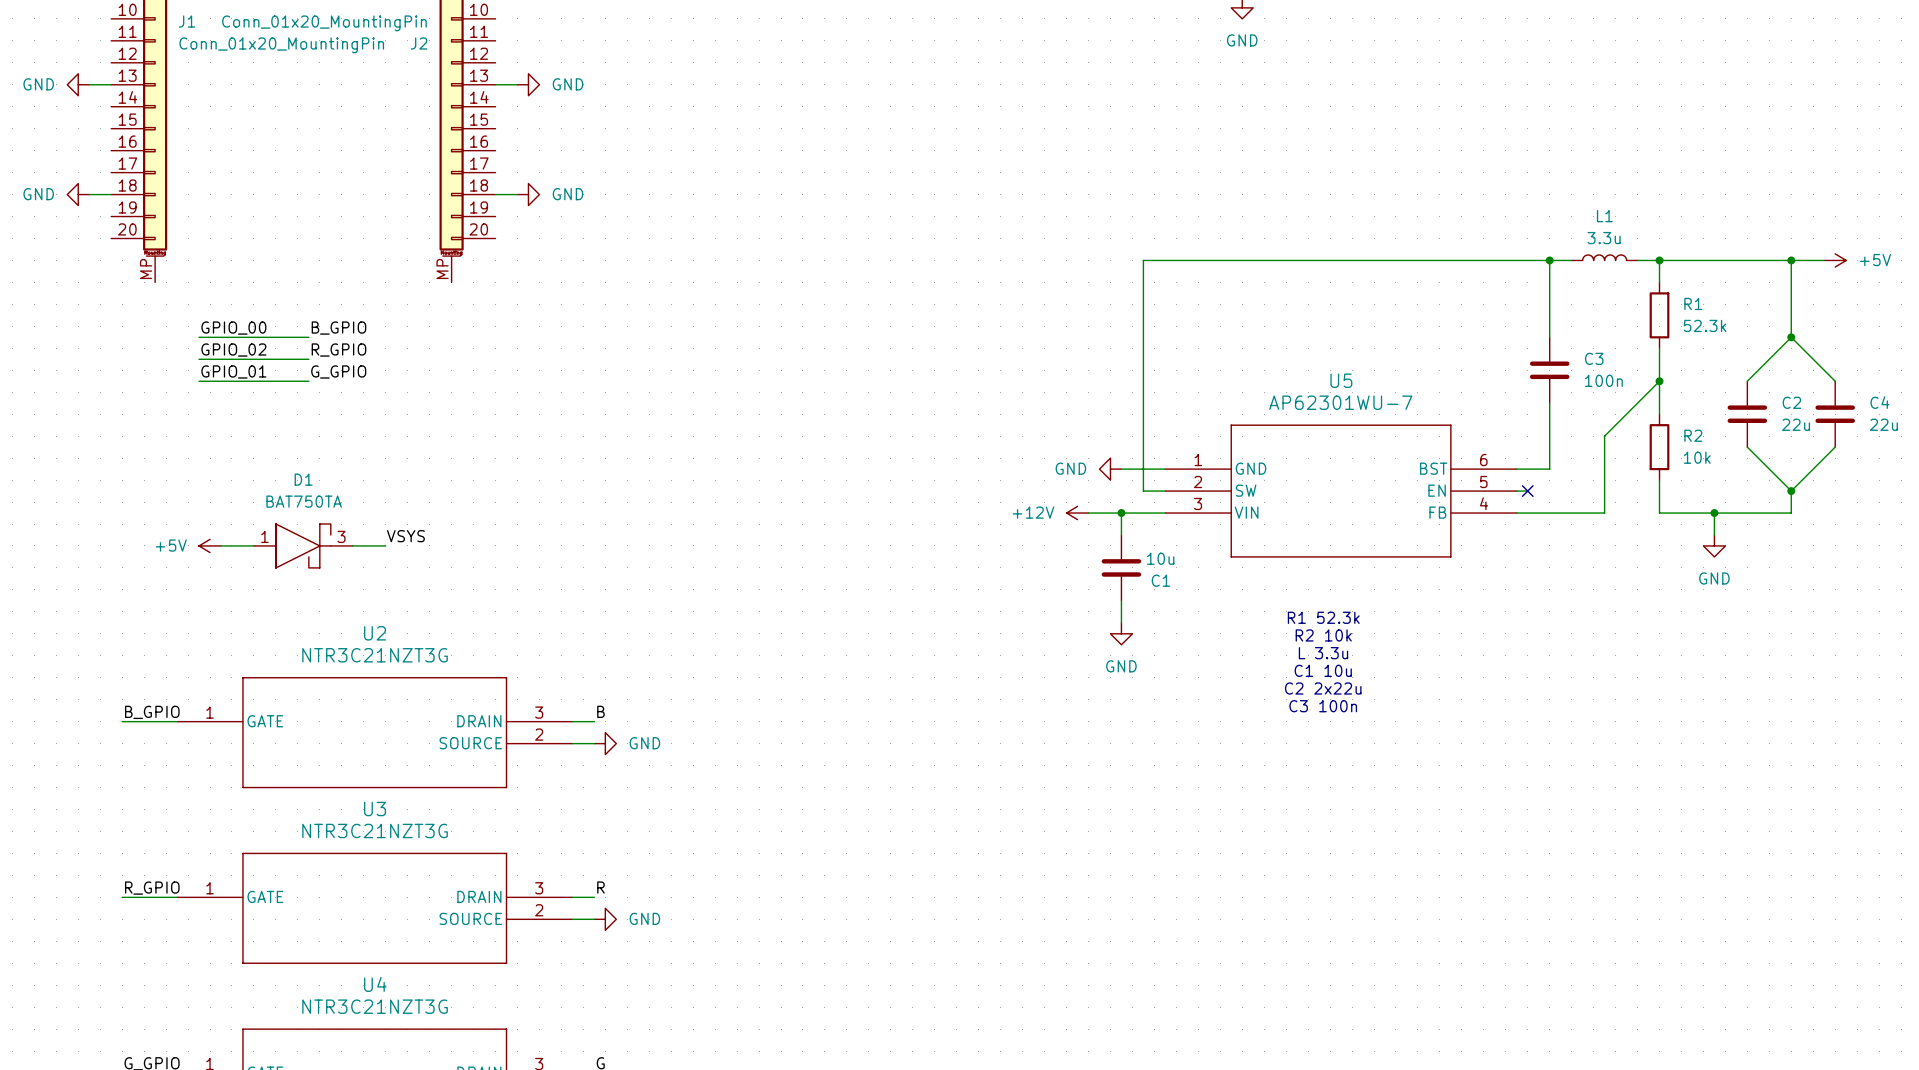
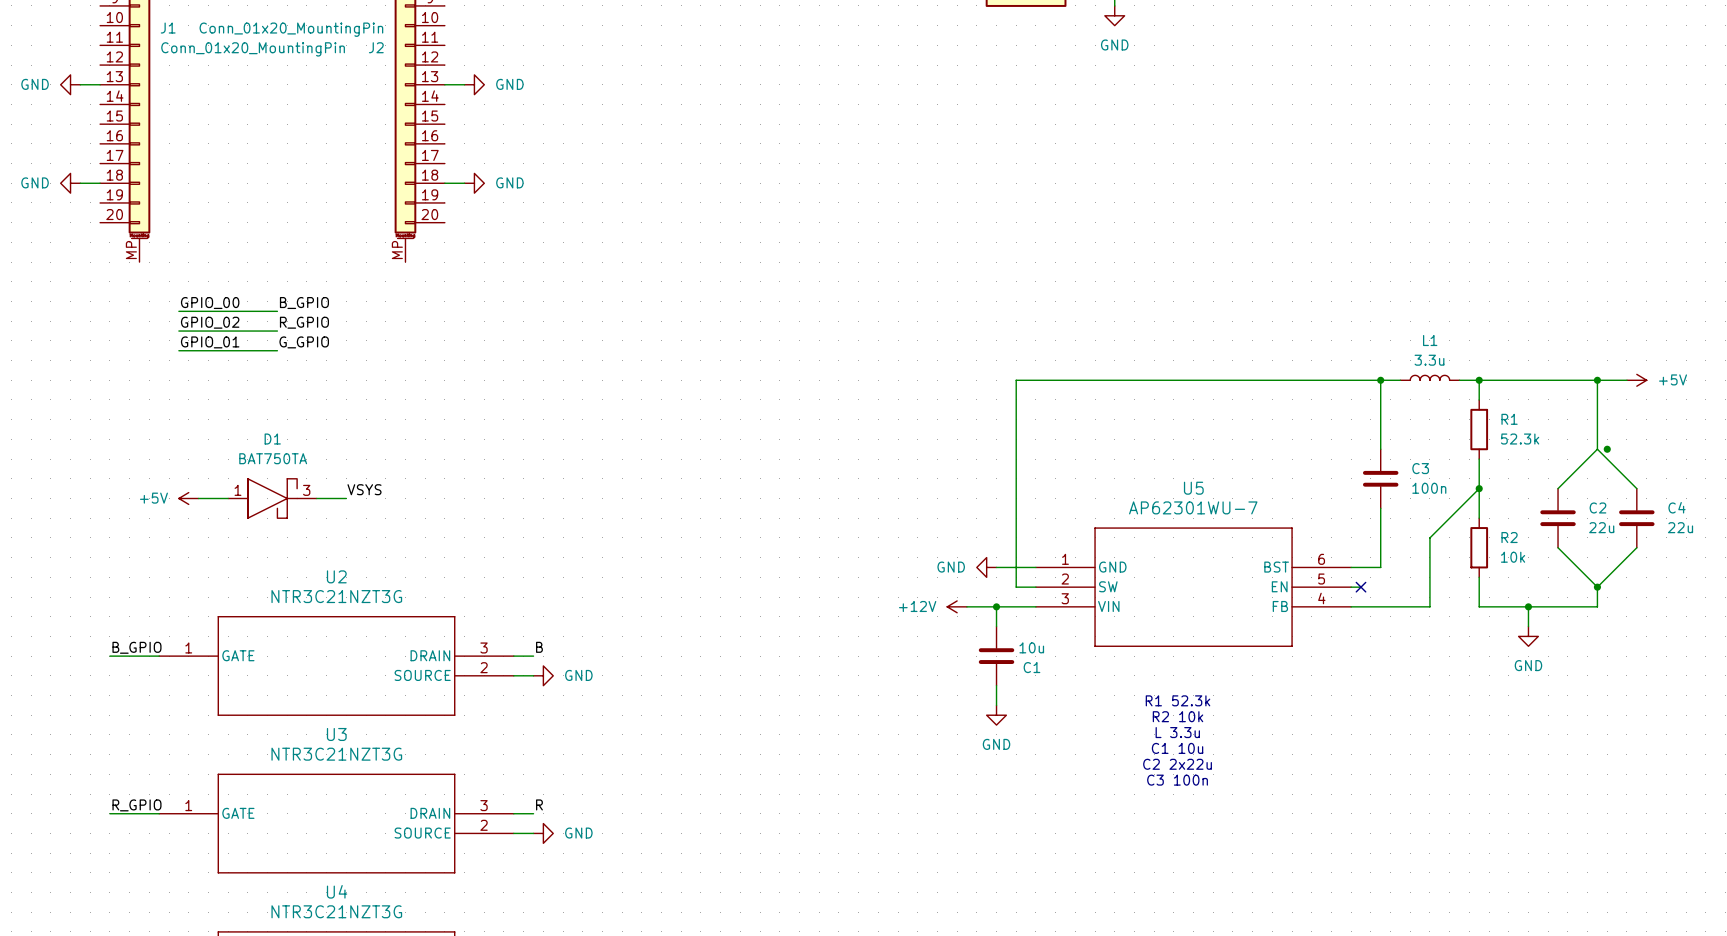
L1 position: (1604, 257) -> (1429, 377)
wire: (1549, 260) (1549, 337) -> (1380, 380) (1380, 449)
junction: (1549, 260) -> none
wire: (1571, 260) (1143, 260) (1143, 491) (1165, 491) -> (1400, 380) (1016, 380) (1016, 587) (1035, 587)
wire: (1637, 260) (1824, 260) -> (1459, 380) (1626, 380)
wire: (1659, 260) (1659, 282) -> (1479, 380) (1479, 399)
junction: (1659, 260) -> none
wire: (1791, 260) (1791, 337) -> (1597, 380) (1597, 449)
junction: (1791, 260) -> none
power symbol position: +5V (1835, 260) -> +5V (1636, 380)
R1 position: (1659, 315) -> (1479, 429)
wire: (1791, 337) (1835, 381) -> (1597, 449) (1636, 488)
wire: (1791, 337) (1747, 381) -> (1597, 449) (1558, 488)
junction: (1791, 337) -> none
wire: (1659, 348) (1659, 414) -> (1479, 459) (1479, 518)
C3 position: (1549, 370) -> (1380, 478)
wire: (1659, 381) (1604, 436) (1604, 513) (1516, 513) -> (1479, 488) (1429, 537) (1429, 606) (1351, 606)
junction position: (1659, 381) -> (1479, 380)
wire: (1549, 403) (1549, 469) (1516, 469) -> (1380, 508) (1380, 567) (1351, 567)
junction: none -> (1380, 380)
C2 position: (1747, 414) -> (1558, 518)
junction: none -> (1597, 380)
C4 position: (1835, 414) -> (1636, 518)
R2 position: (1659, 447) -> (1479, 547)
wire: (1747, 447) (1791, 491) -> (1558, 547) (1597, 587)
wire: (1835, 447) (1791, 491) -> (1636, 547) (1597, 587)
power symbol: GND (1110, 469) -> none
wire: (1121, 469) (1165, 469) -> (996, 567) (1035, 567)
wire: (1659, 480) (1659, 513) (1791, 513) (1791, 491) -> (1479, 577) (1479, 606) (1597, 606) (1597, 587)
U5 position: (1341, 491) -> (1193, 587)
wire: (1516, 491) (1527, 491) -> (1351, 587) (1361, 587)
no-connect mark: (1527, 491) -> none
power symbol position: +12V (1077, 513) -> +12V (957, 606)
wire: (1088, 513) (1165, 513) -> (966, 606) (1035, 606)
wire: (1121, 513) (1121, 534) -> (996, 606) (996, 626)
junction: (1121, 513) -> none
wire: (1714, 513) (1714, 534) -> (1528, 606) (1528, 626)
junction: (1714, 513) -> none
junction: none -> (1479, 488)
power symbol position: GND (1714, 545) -> GND (1528, 636)
C1 position: (1121, 567) -> (996, 656)
wire: (1121, 600) (1121, 622) -> (996, 685) (996, 705)
text position: R1 52.3k (1323, 617) -> R1 52.3k (1178, 700)
power symbol rotation: 0° (1121, 633) -> 90° clockwise (986, 567)
power symbol position: GND (1121, 633) -> GND (986, 567)
text position: R2 10k (1323, 635) -> R2 10k (1178, 716)
no-connect mark: none -> (1361, 587)
junction: none -> (1597, 587)
text position: L 3.3u (1323, 653) -> L 3.3u (1177, 732)
junction: none -> (996, 606)
junction: none -> (1528, 606)
text position: C1 10u (1323, 670) -> C1 10u (1177, 748)
text position: C2 2x22u (1323, 688) -> C2 2x22u (1177, 764)
text position: C3 100n (1323, 706) -> C3 100n (1177, 780)
power symbol: none -> GND (996, 715)

